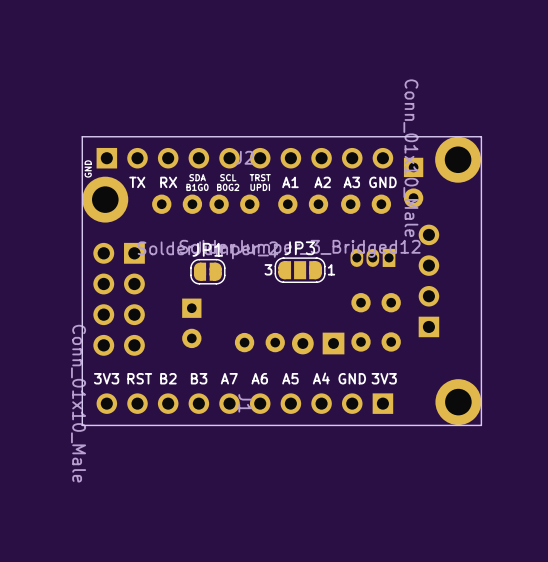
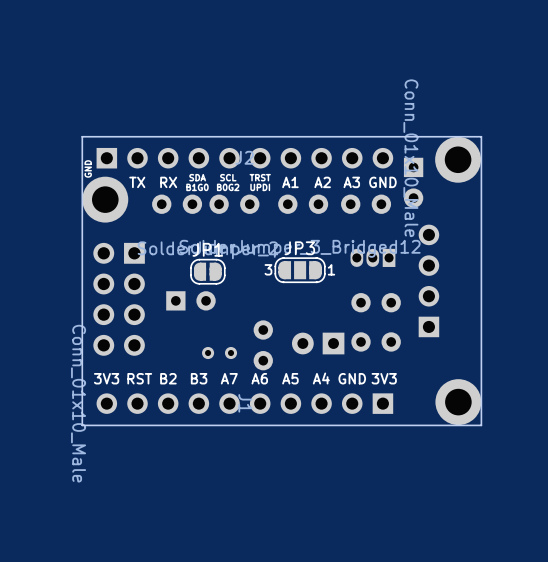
part rotation: 0° (191, 323) -> 90° counterclockwise (190, 300)
part rotation: 0° (259, 342) -> 90° clockwise (263, 345)
part: none -> (219, 353)

